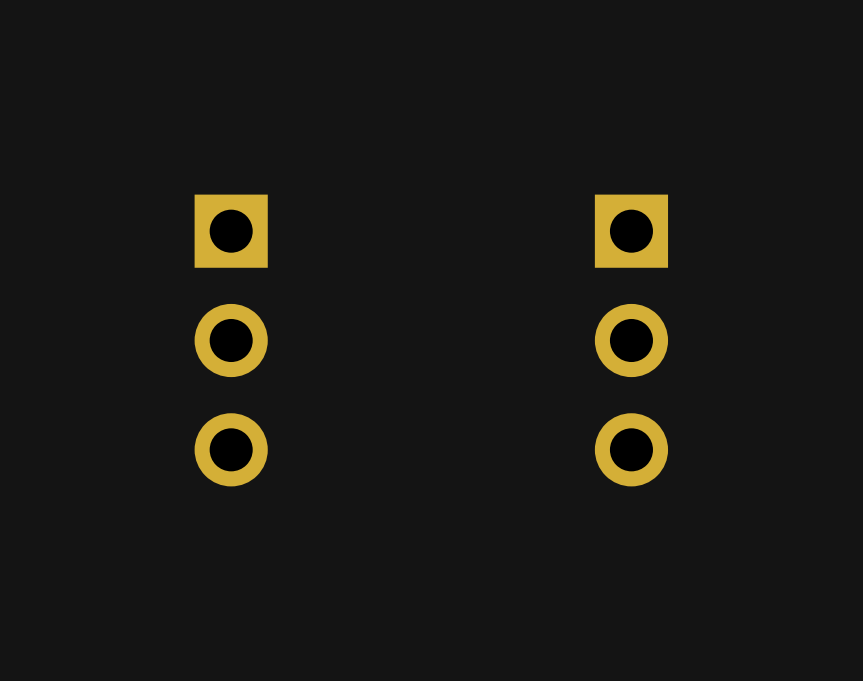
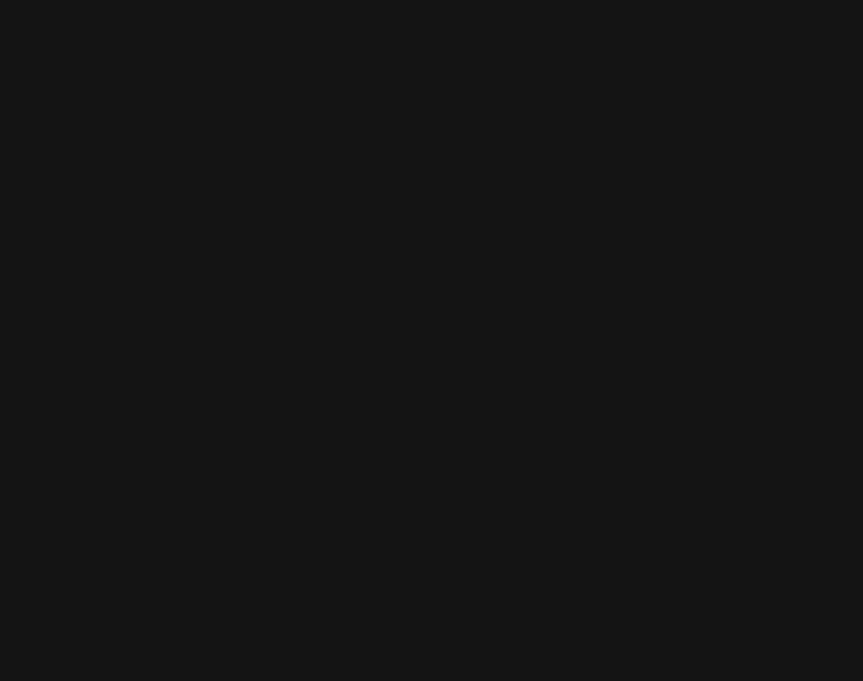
part: (231, 340) -> none
part: (631, 340) -> none

